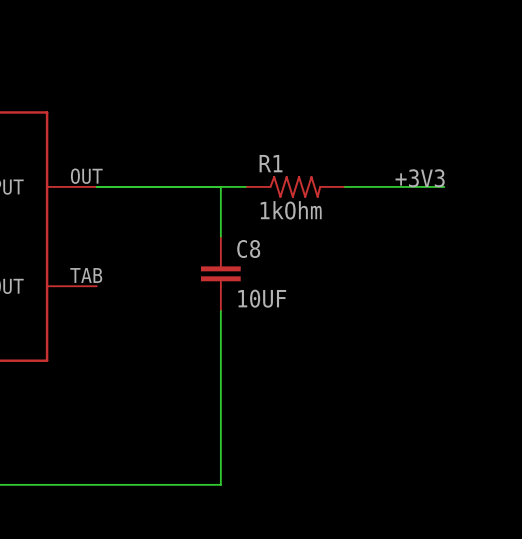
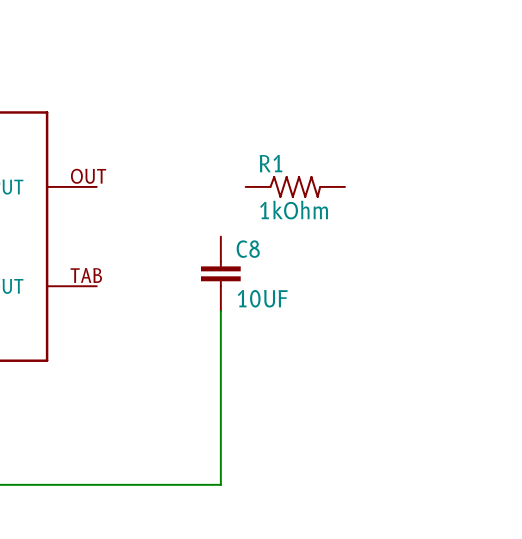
label: +3V3 (420, 178) -> none
wire: (96, 186) (245, 186) -> none
wire: (220, 186) (220, 236) -> none
wire: (344, 186) (444, 186) -> none

